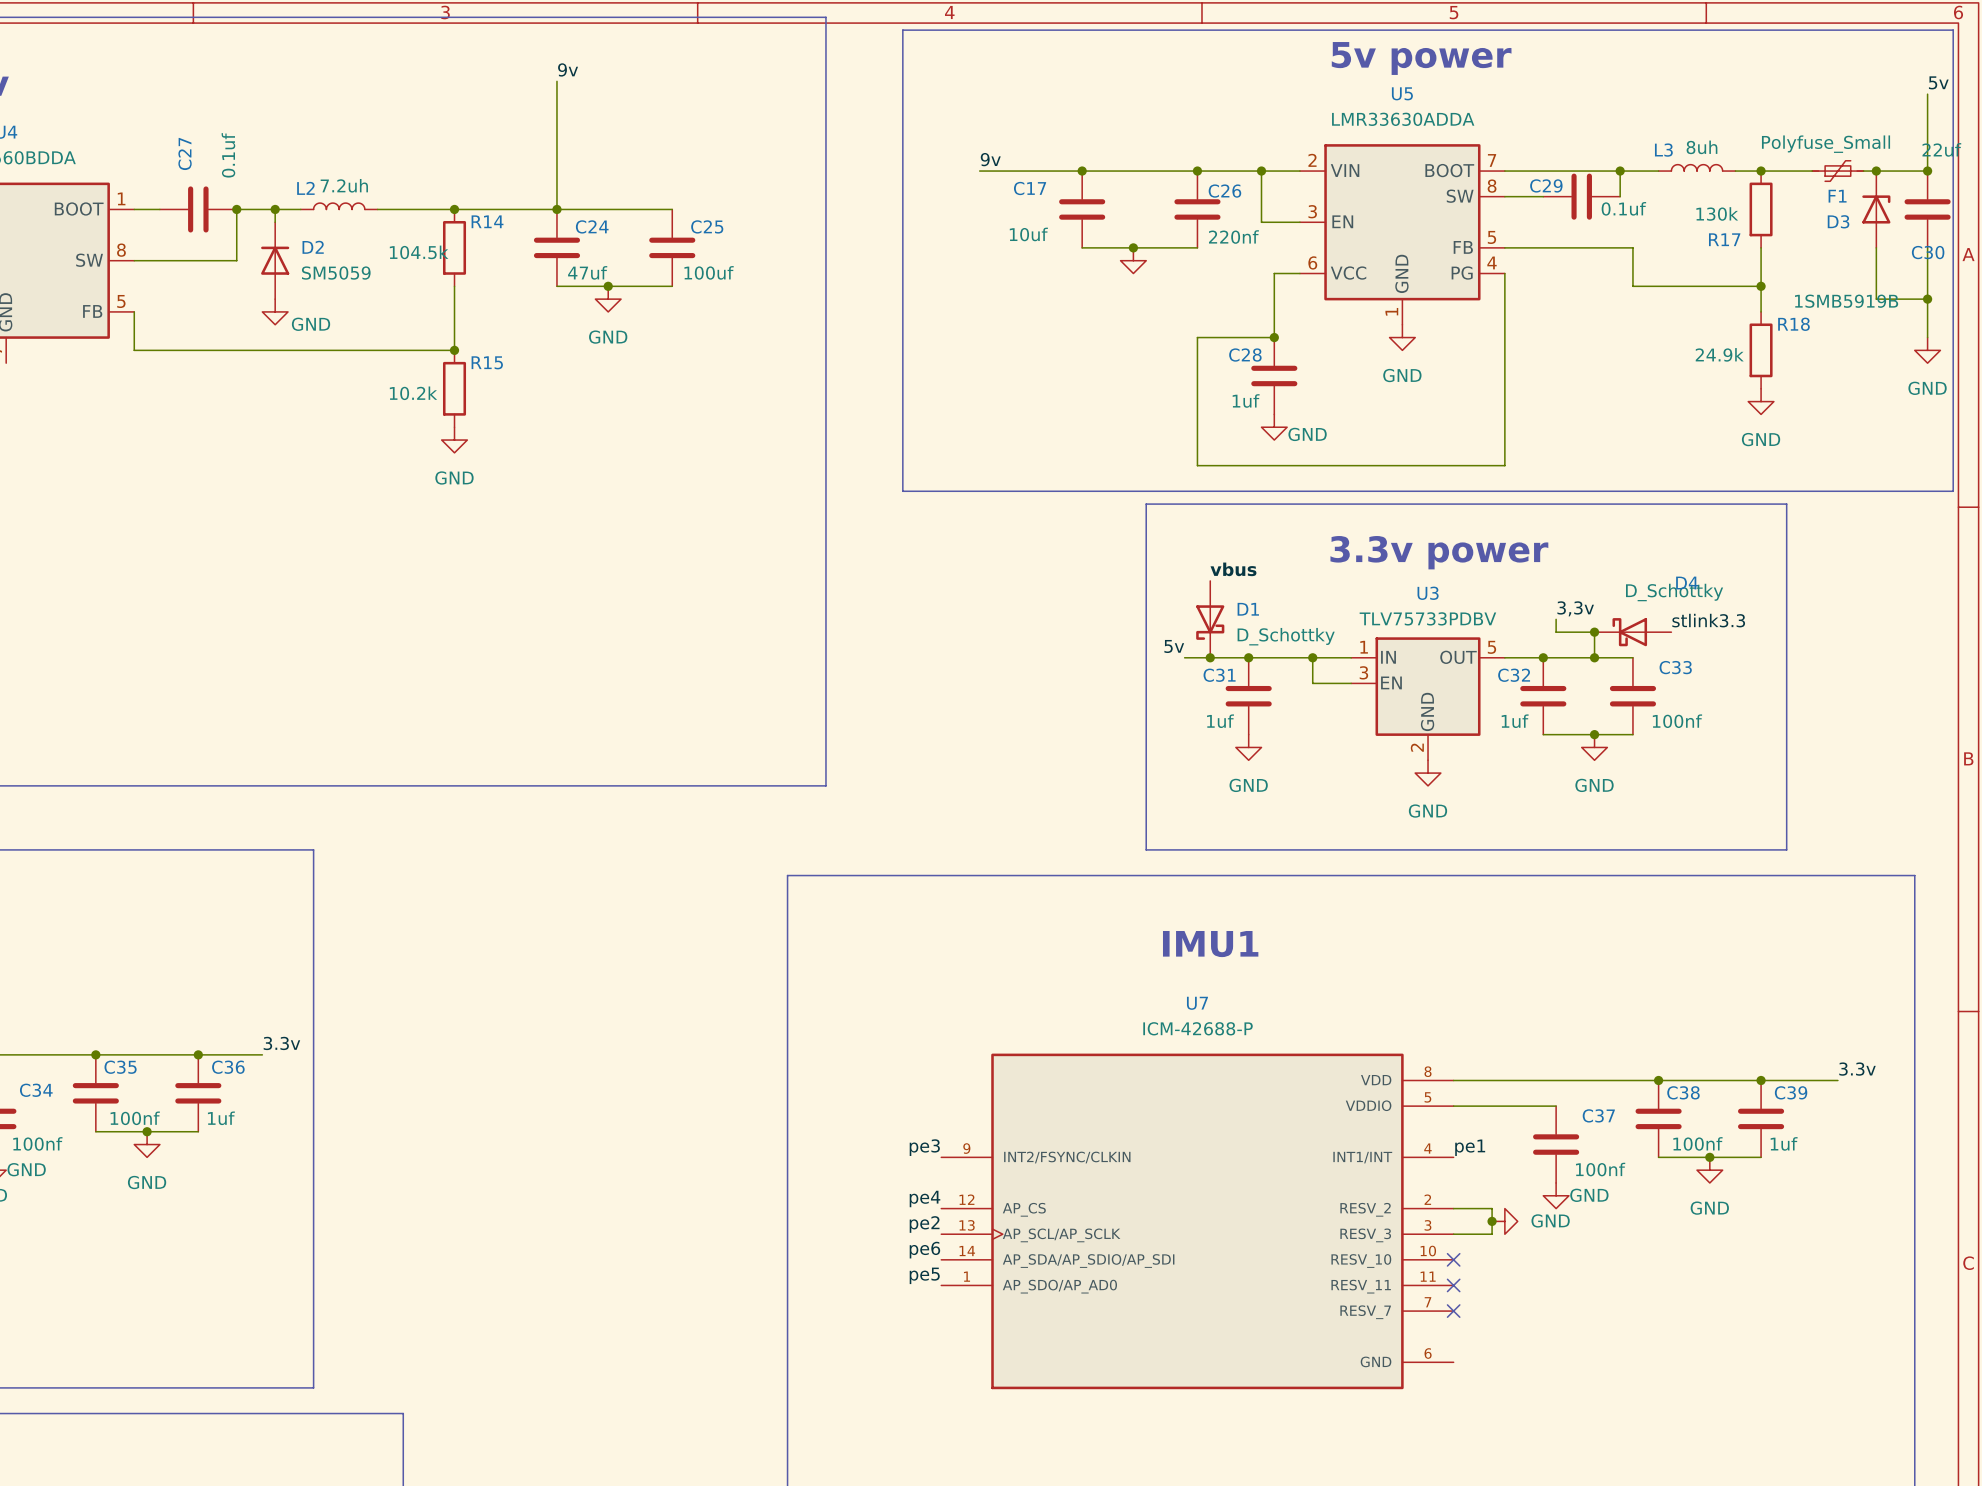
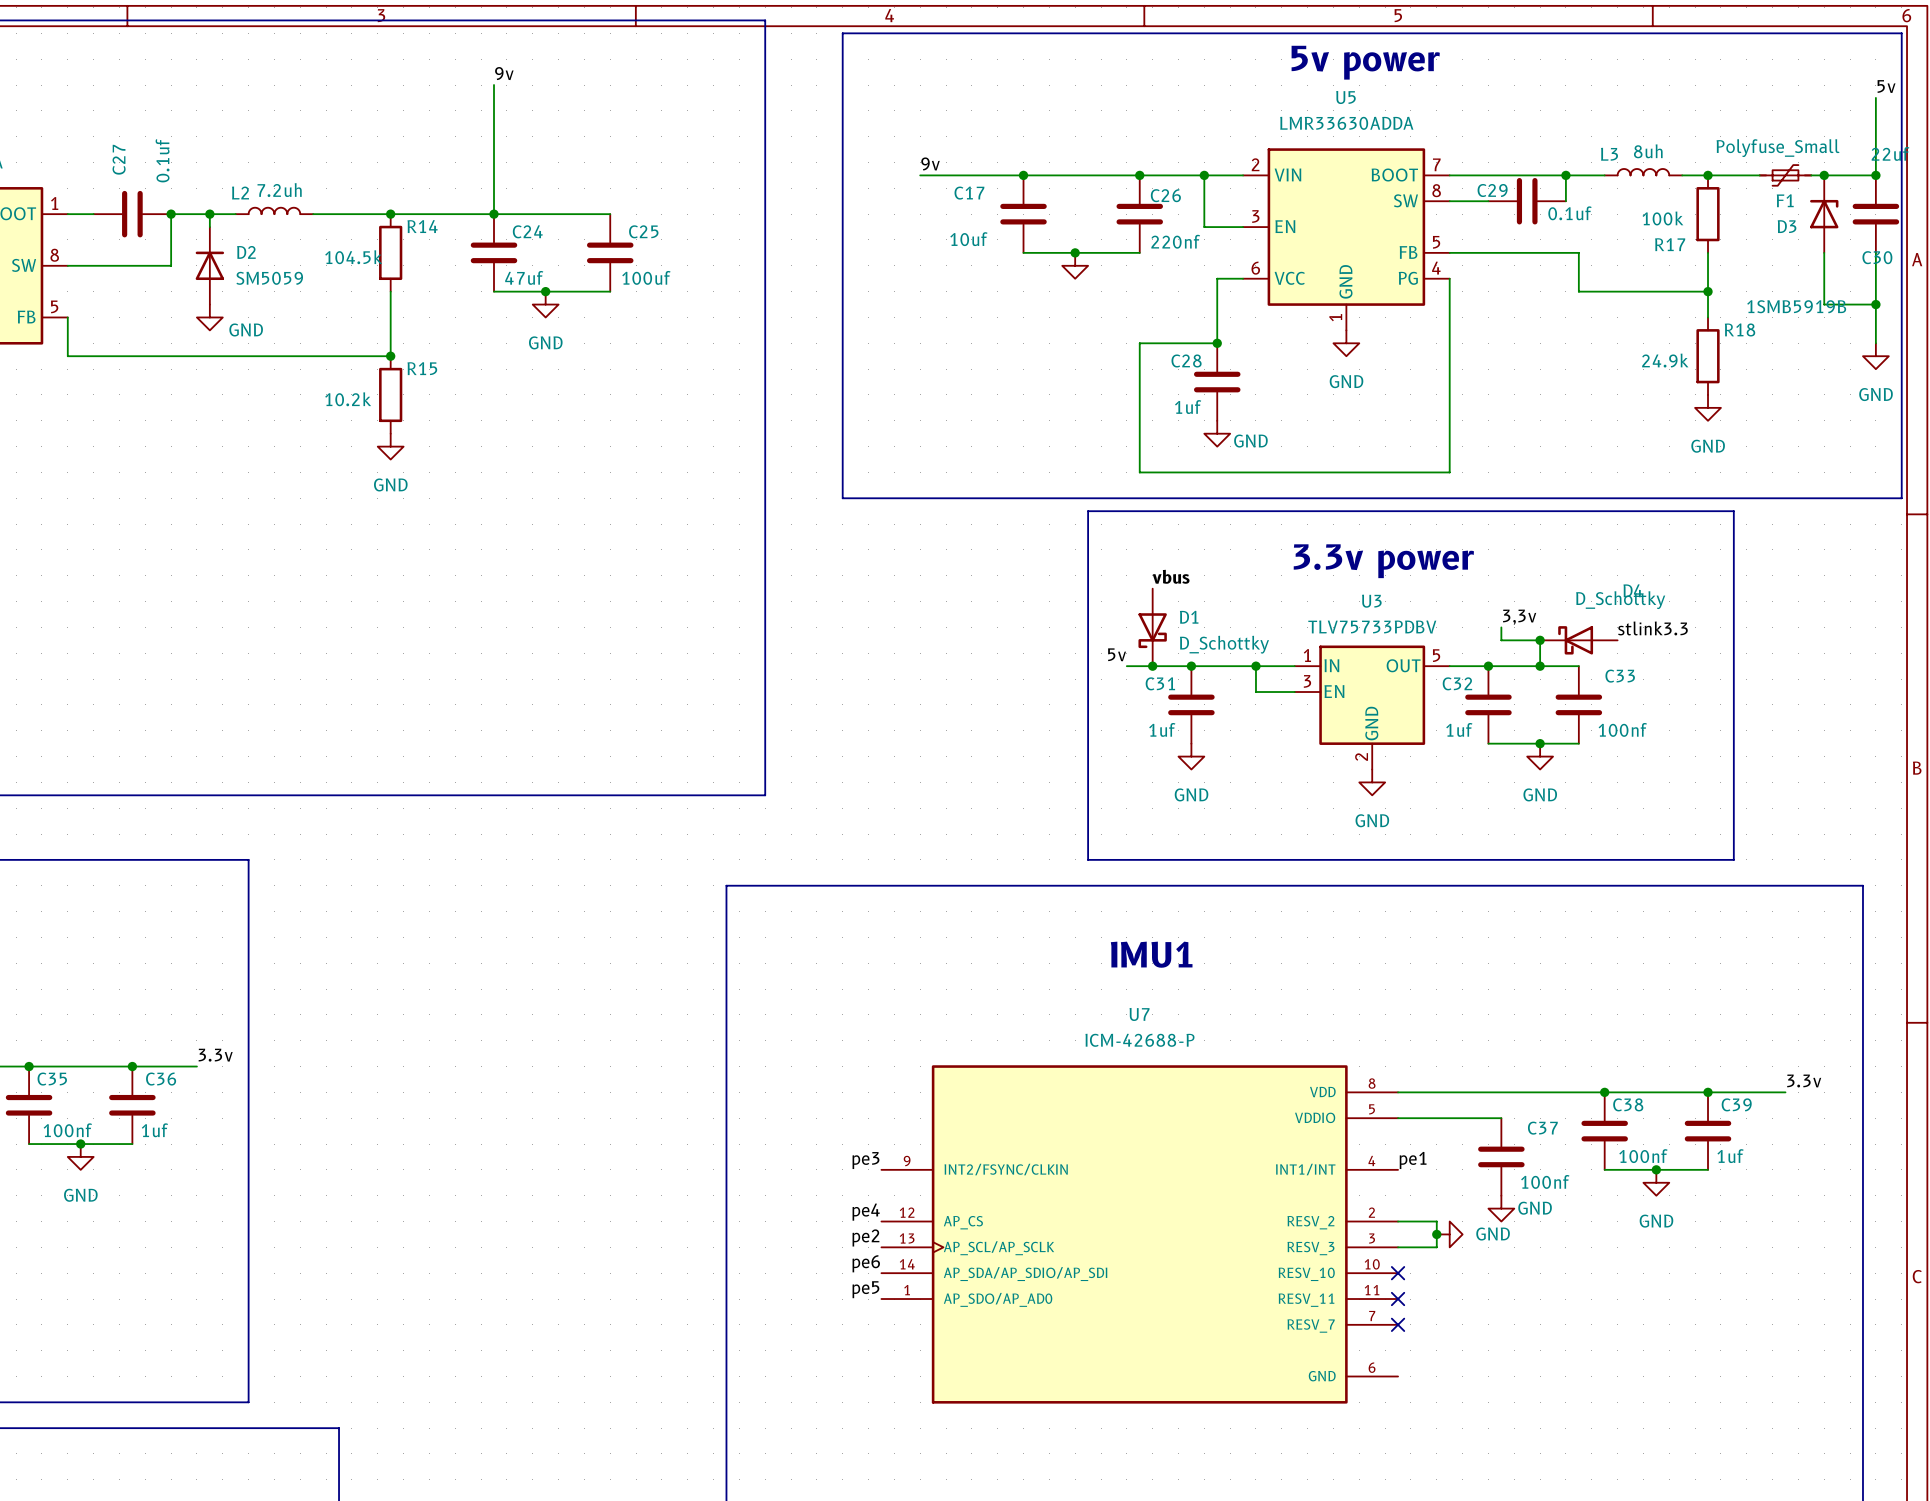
R17 value: 130k (1717, 213) -> 100k (1662, 218)

